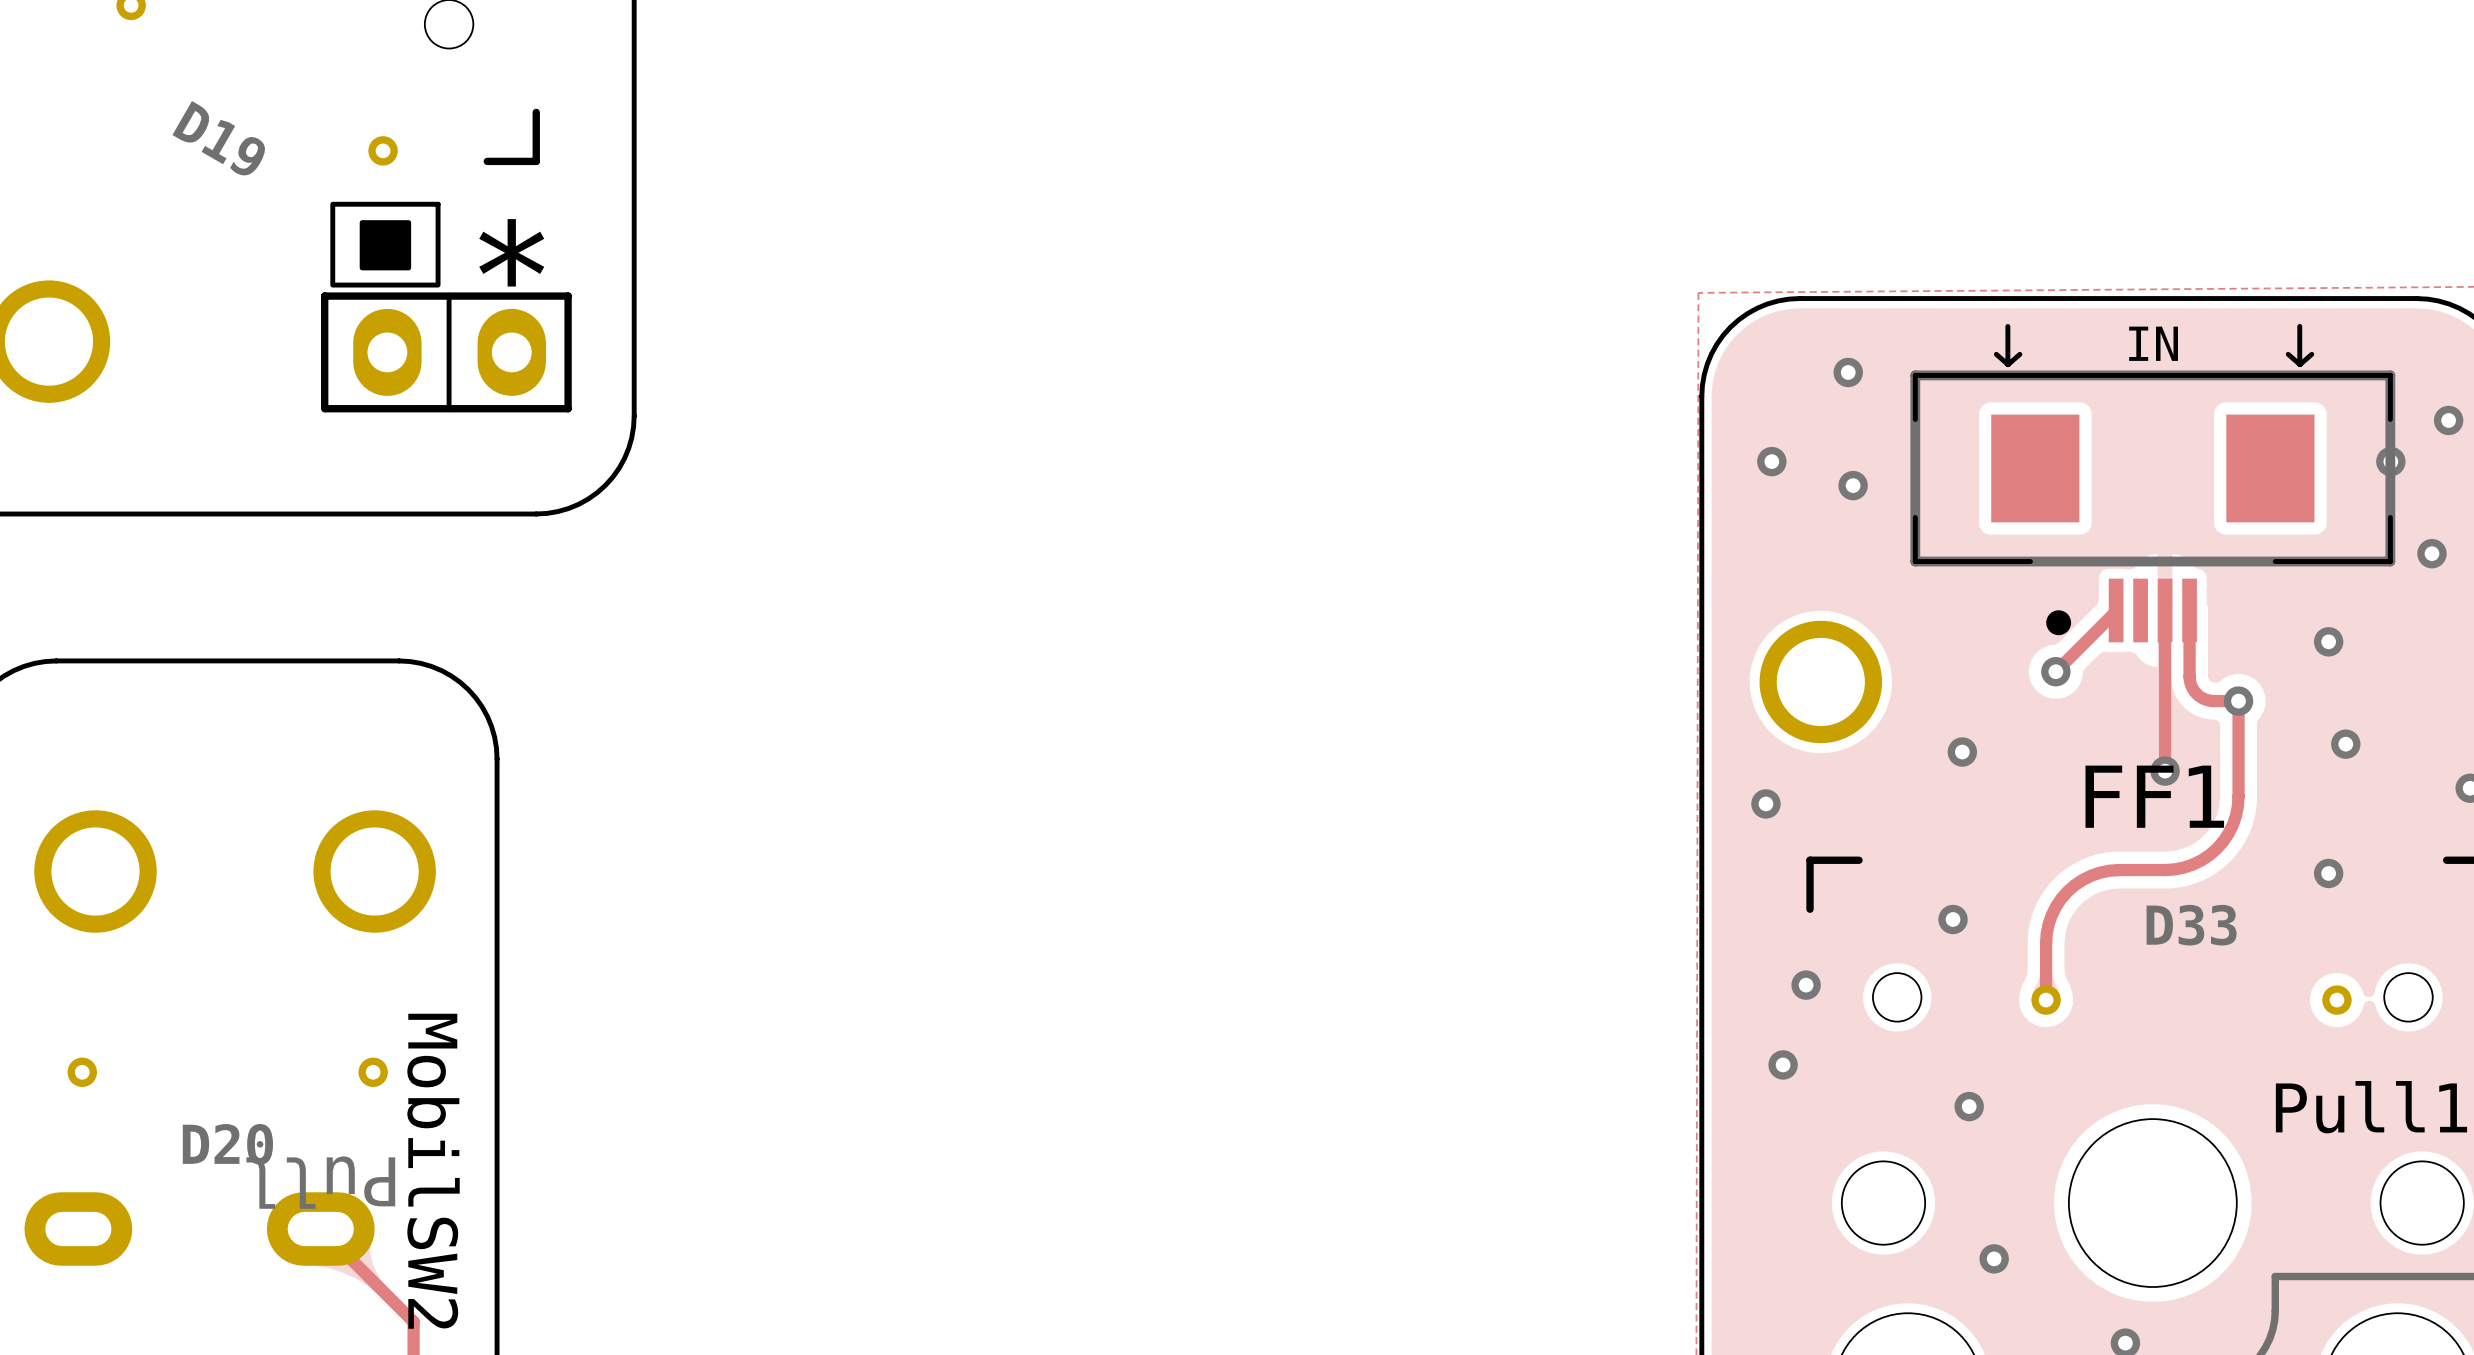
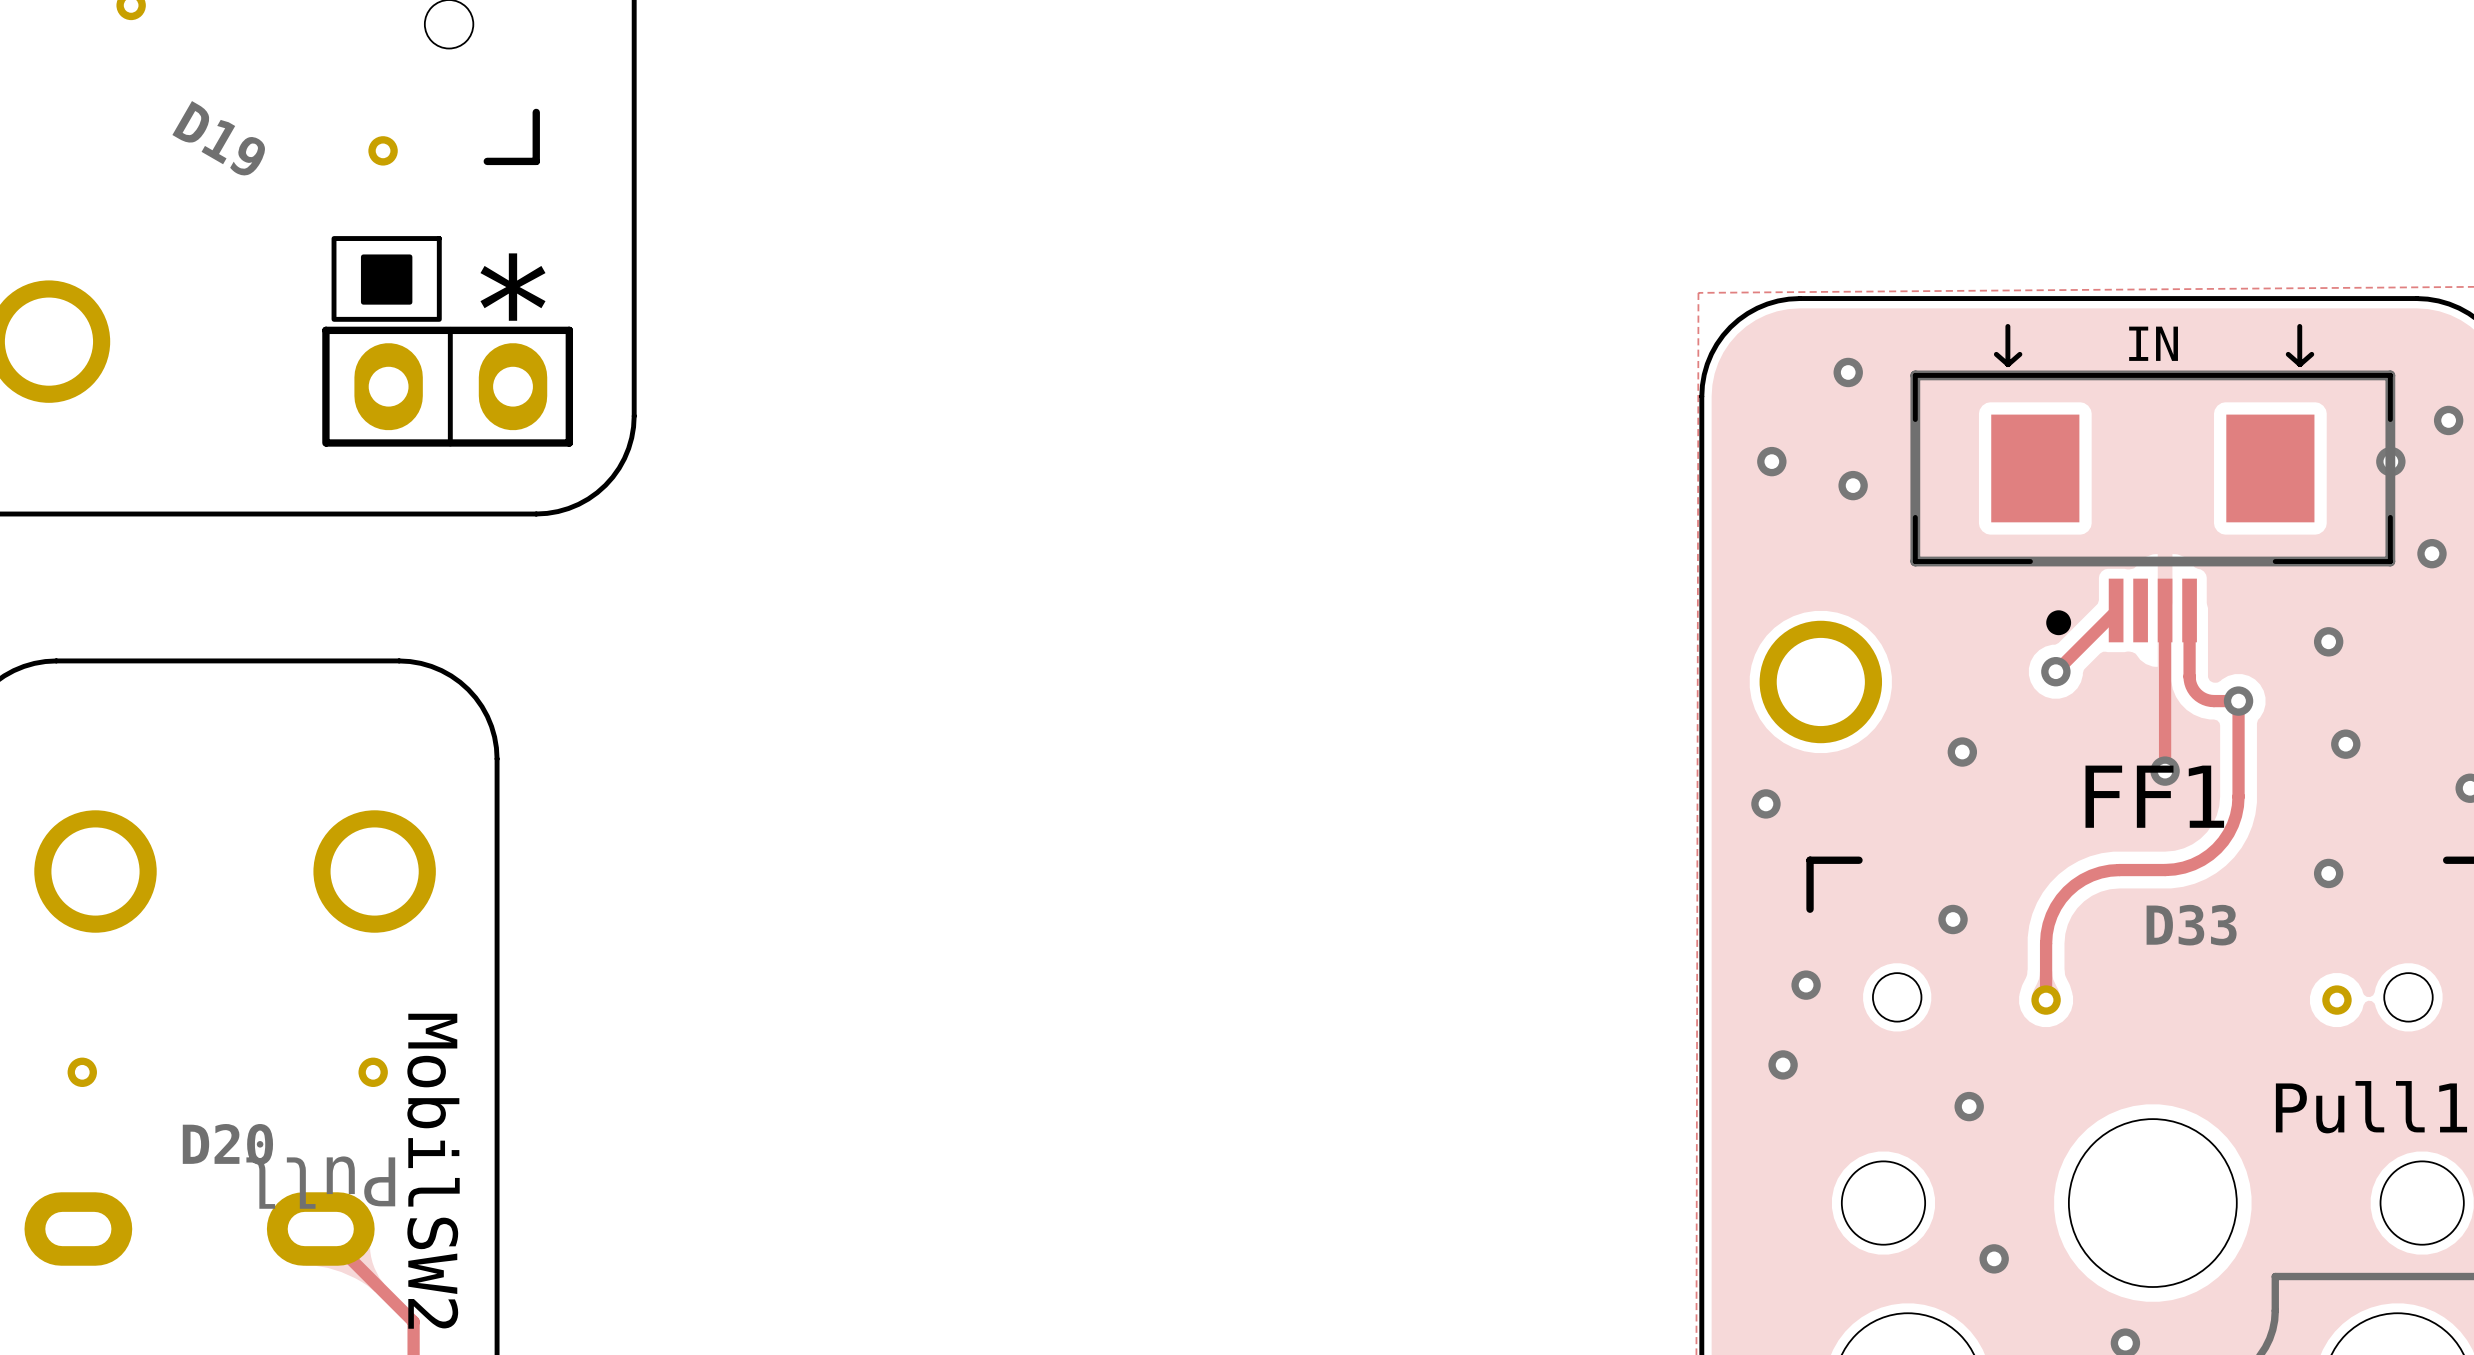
part position: (446, 307) -> (447, 341)

